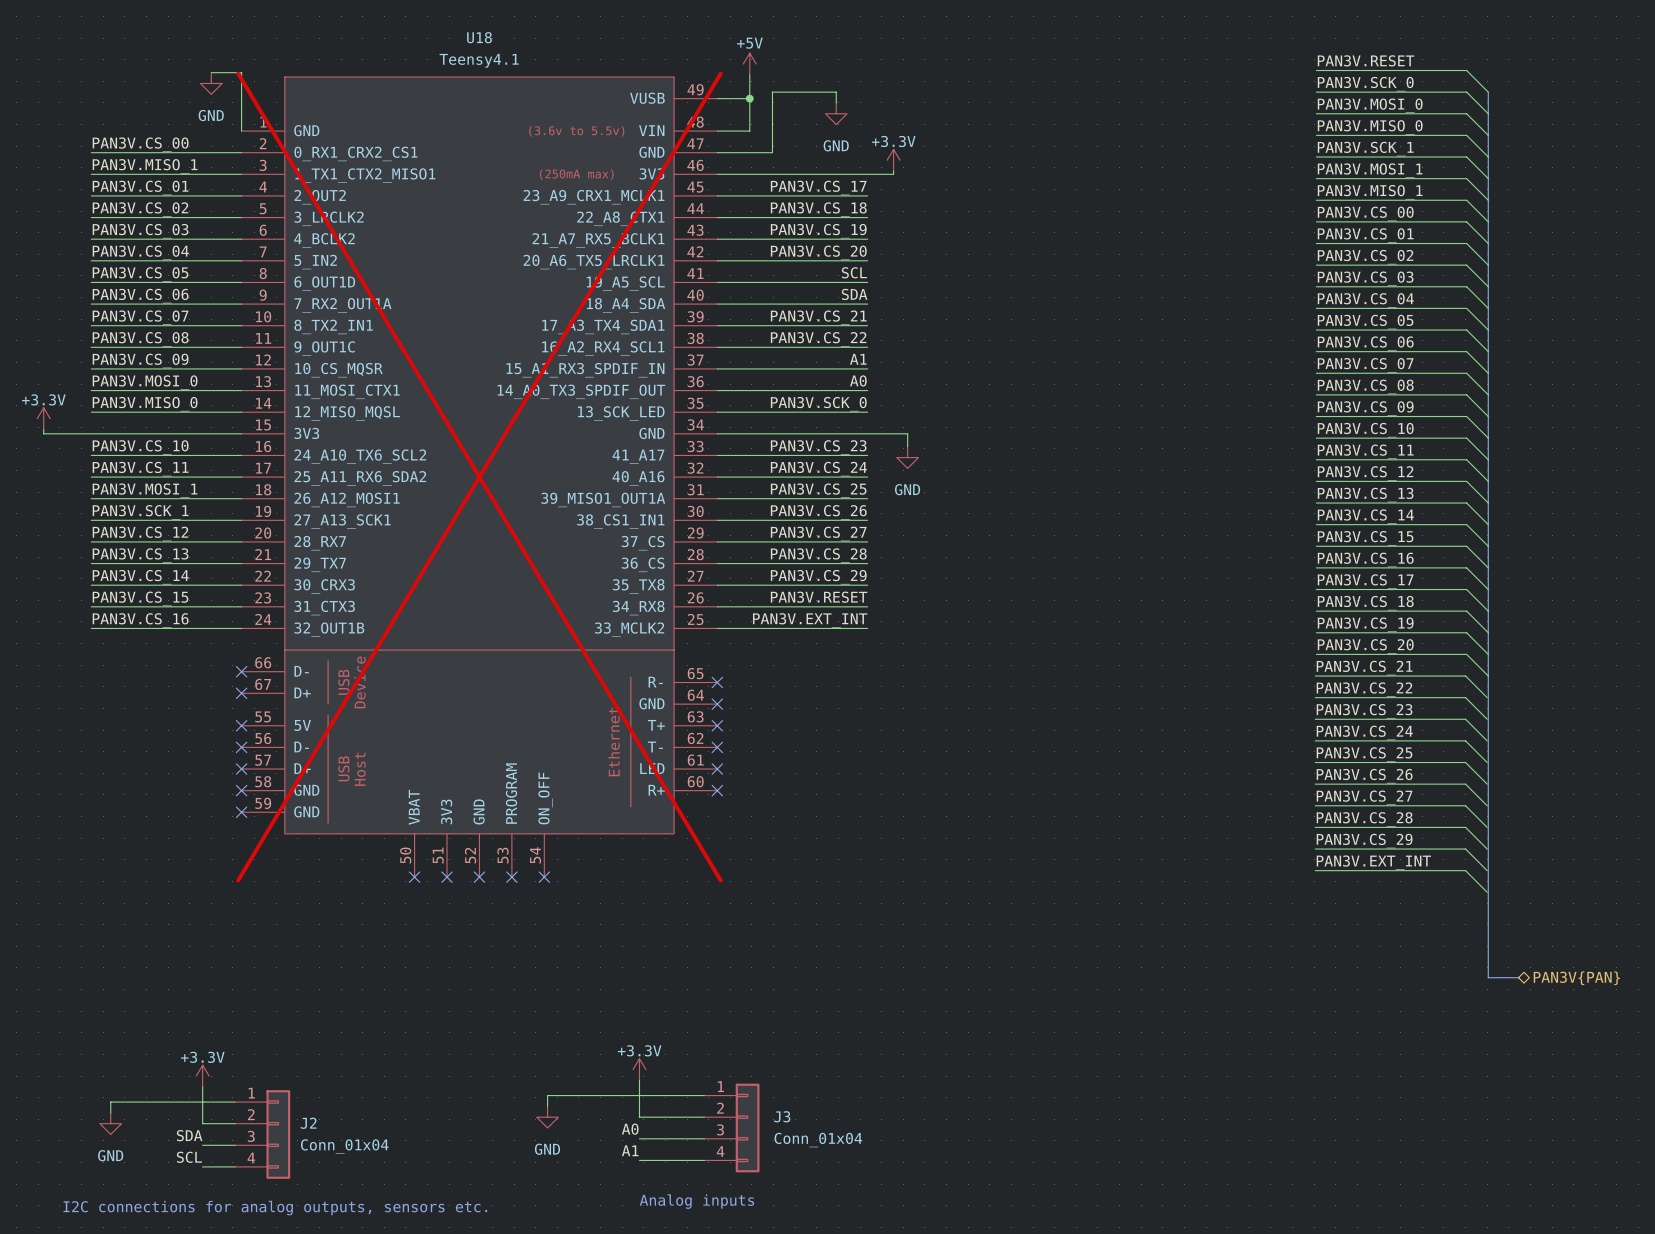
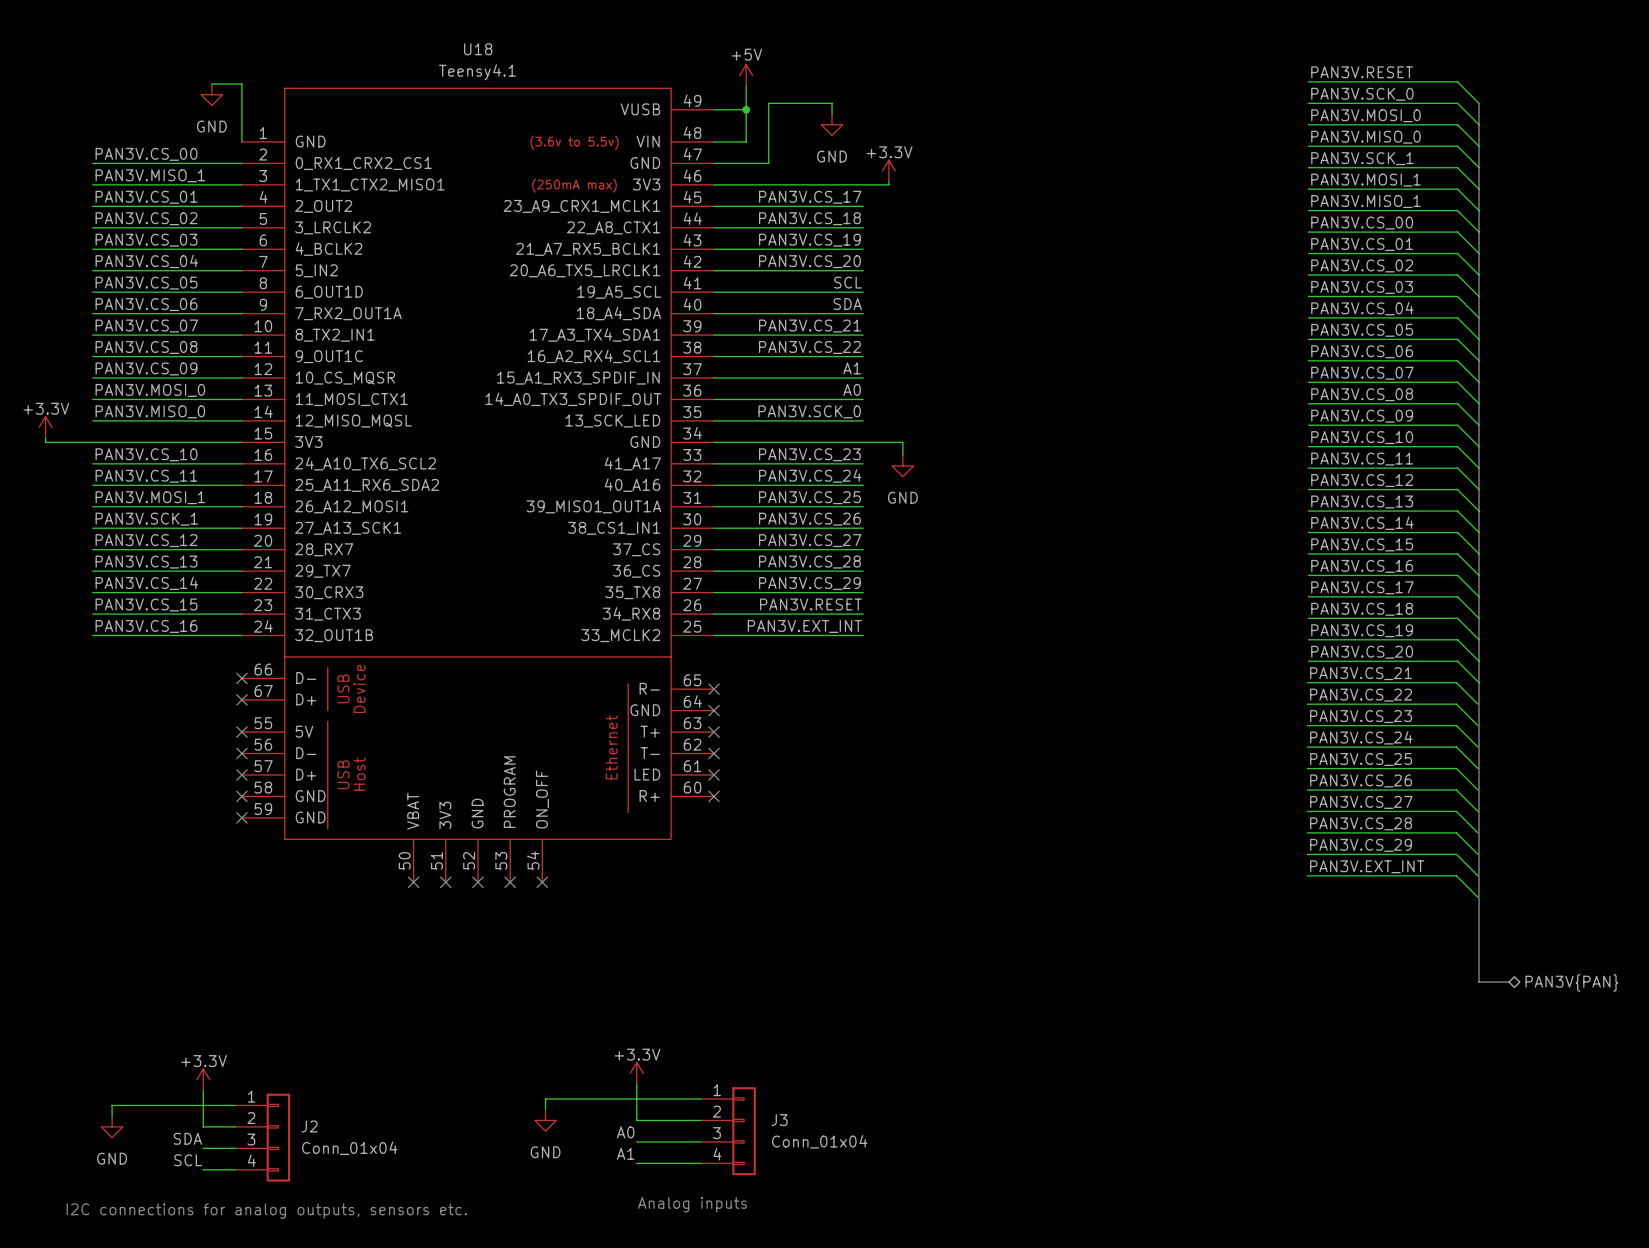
U18 do-not-place cross: (479, 477) -> none

